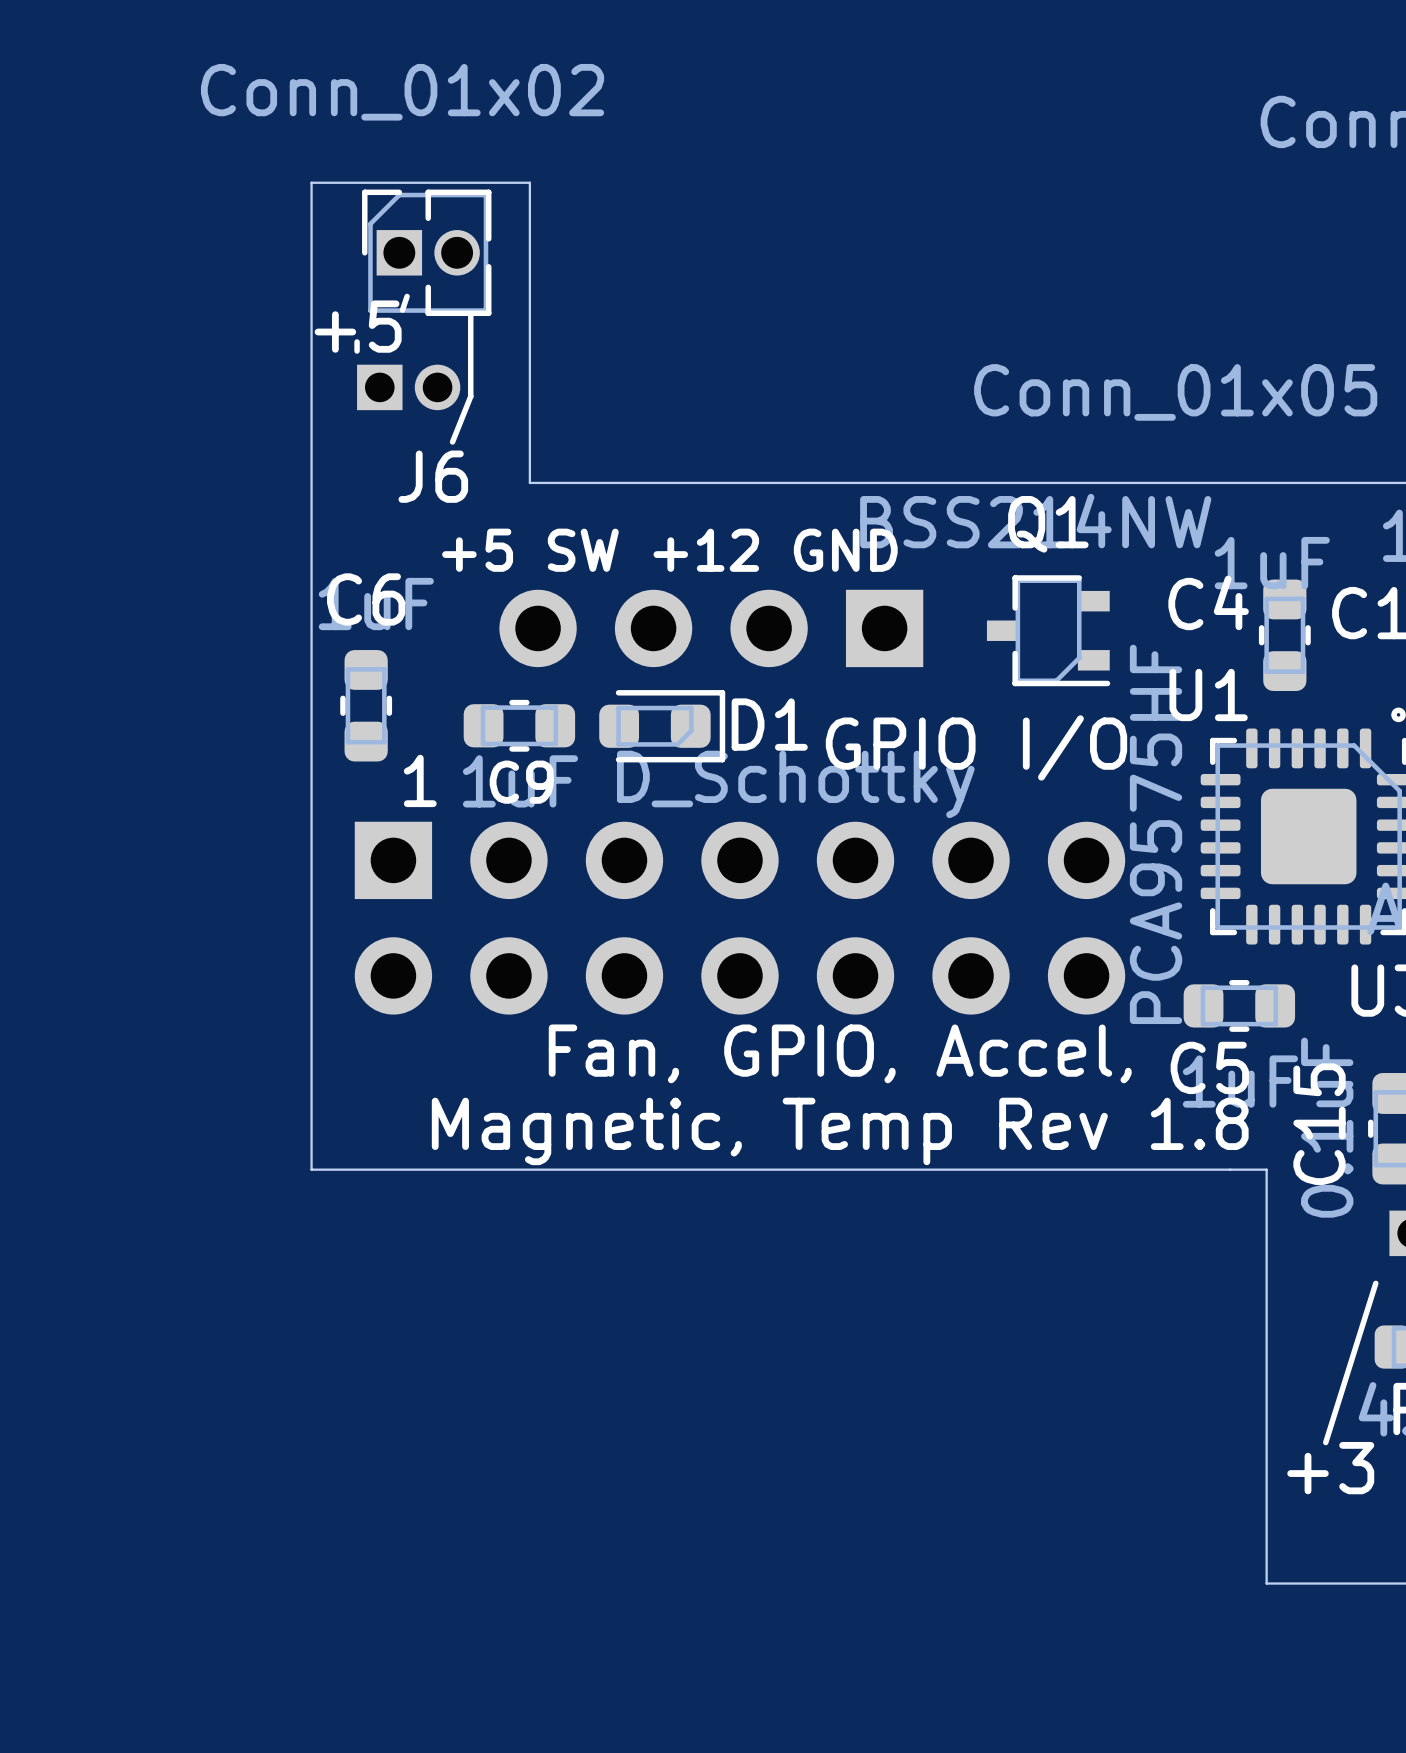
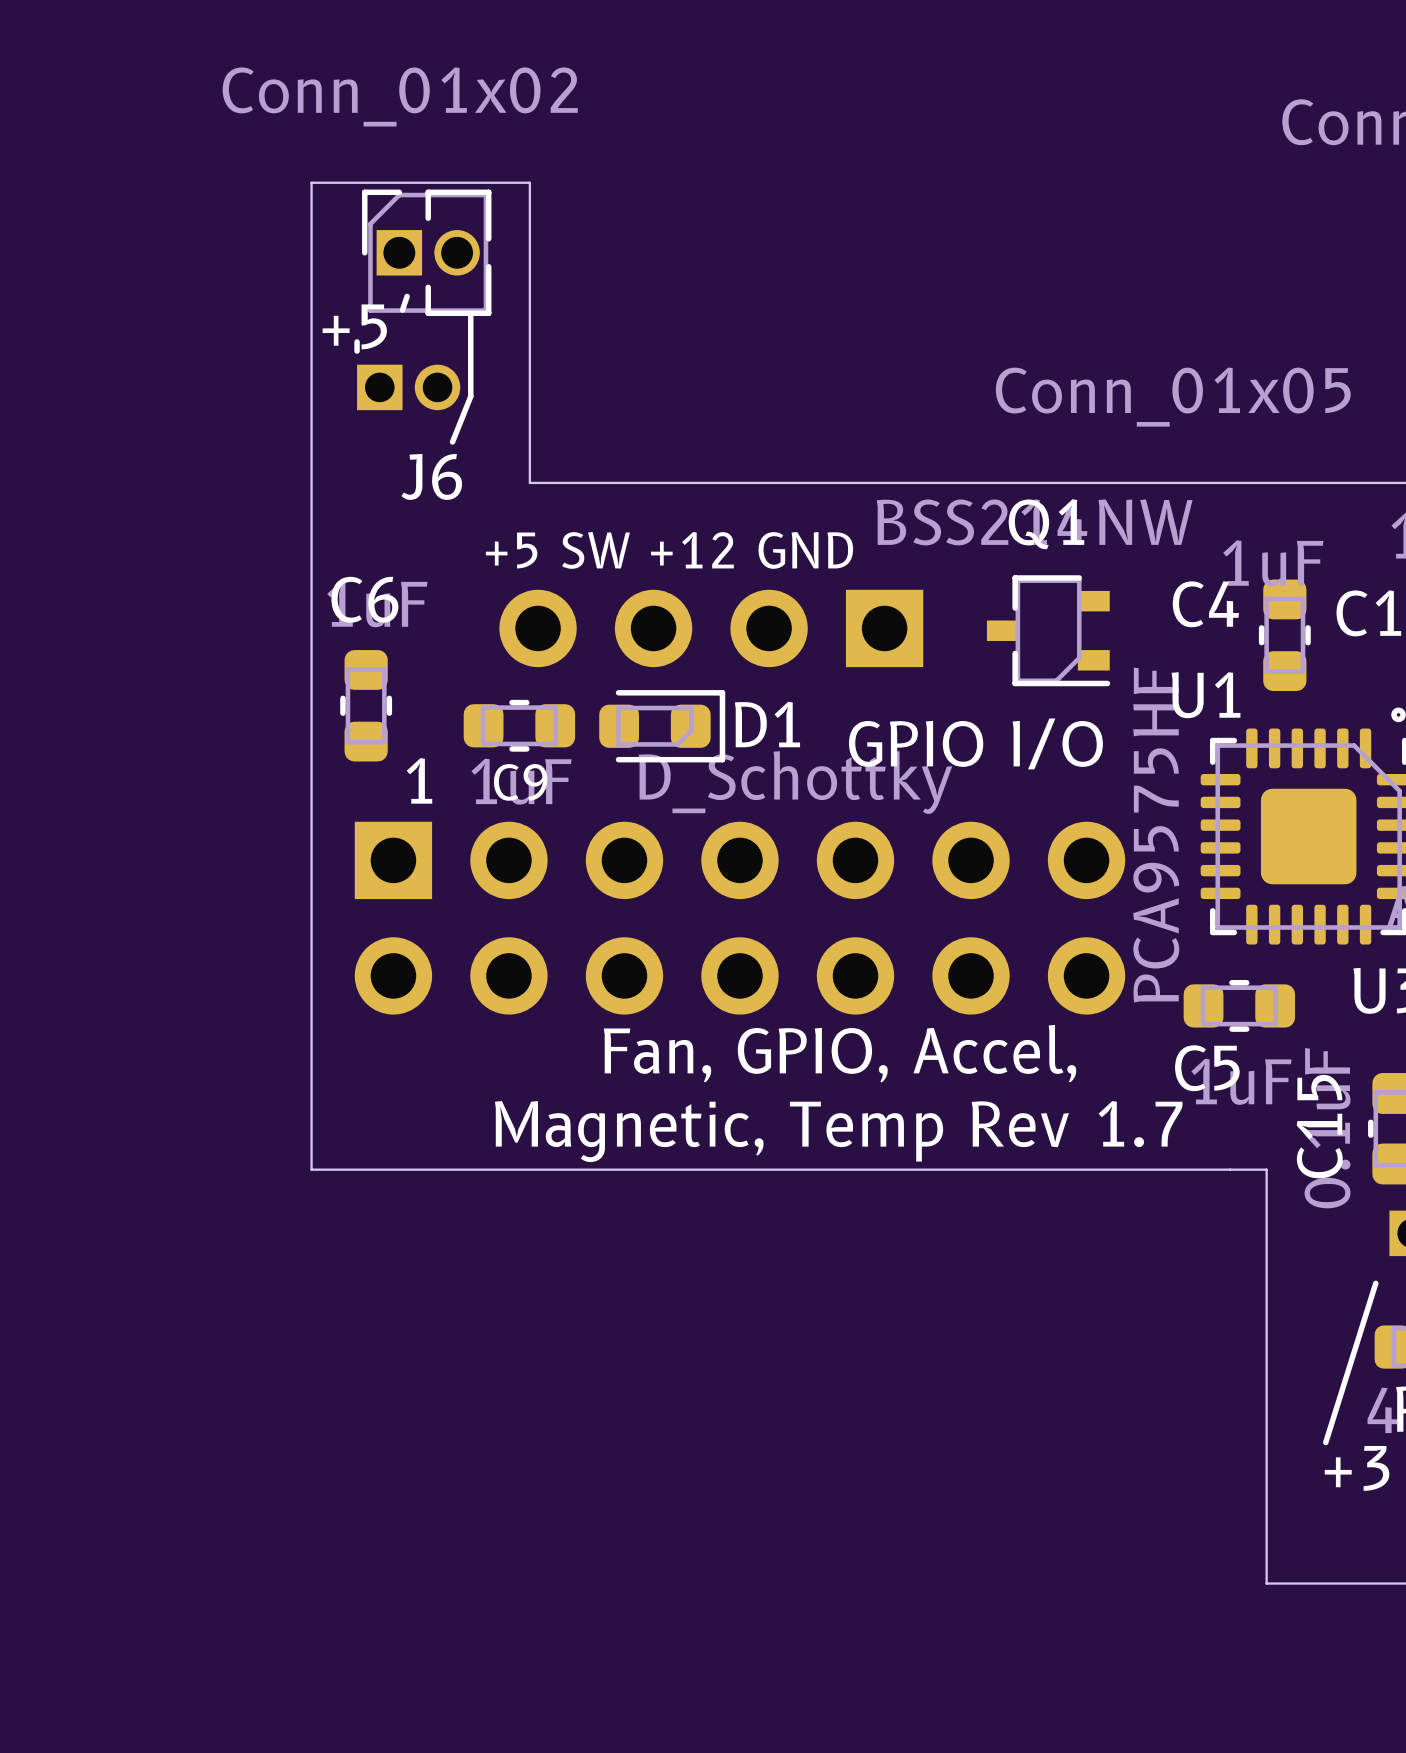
text: Magnetic, Temp Rev 1.8 (840, 1131) -> Magnetic, Temp Rev 1.7 (838, 1131)

